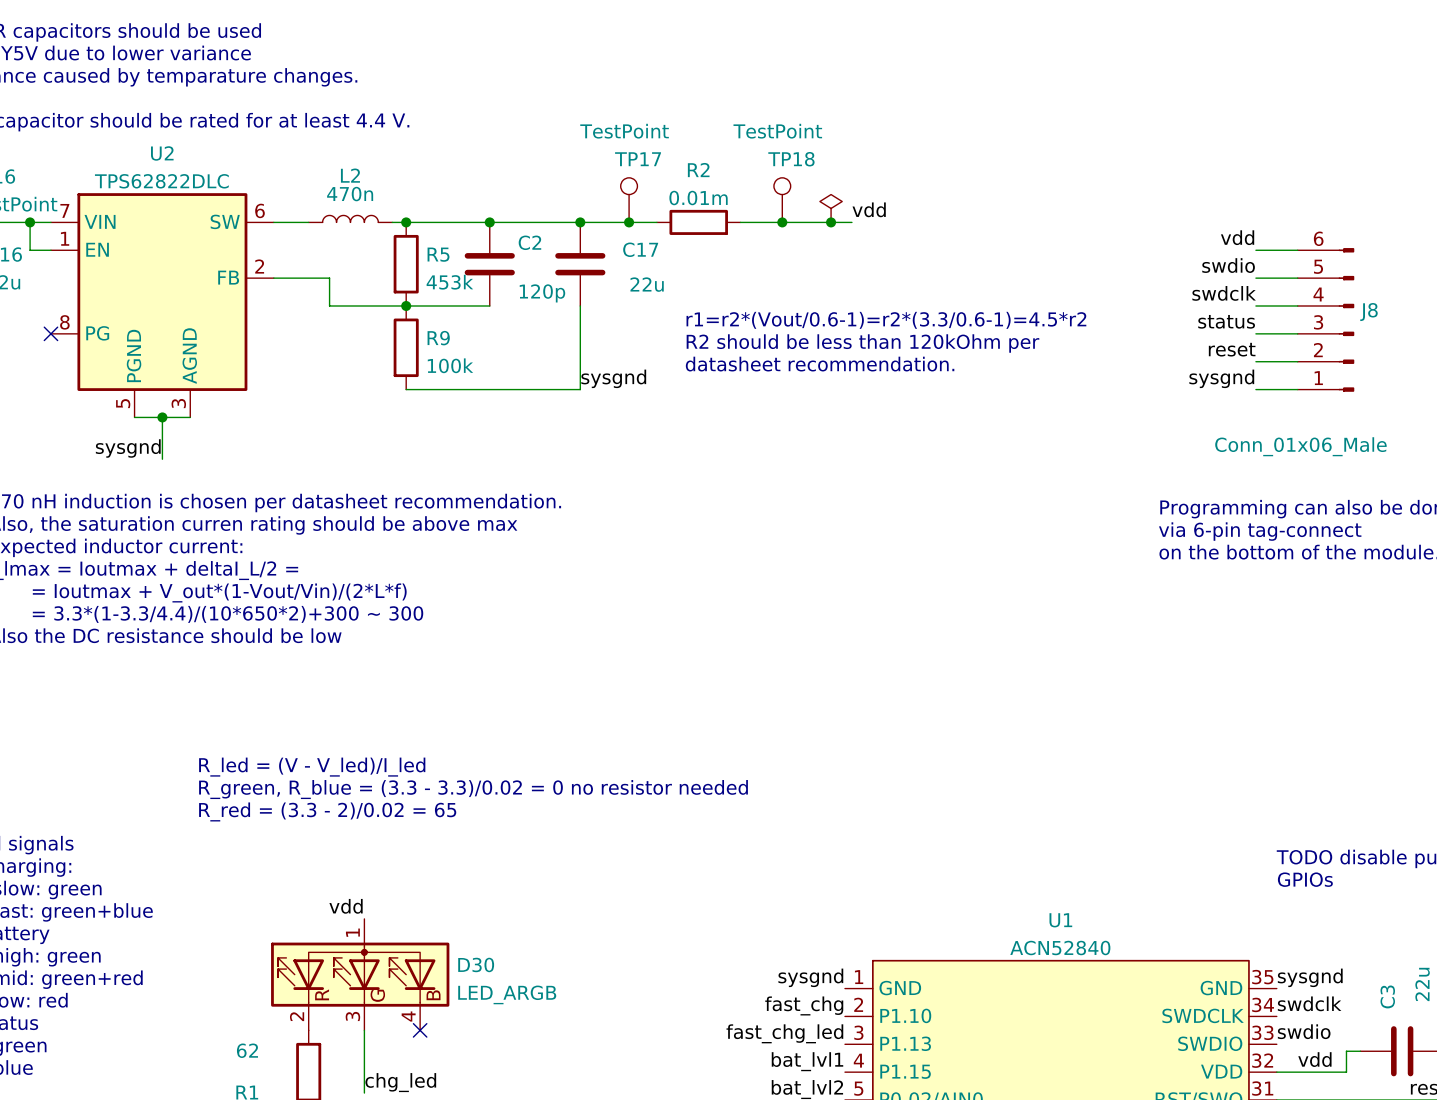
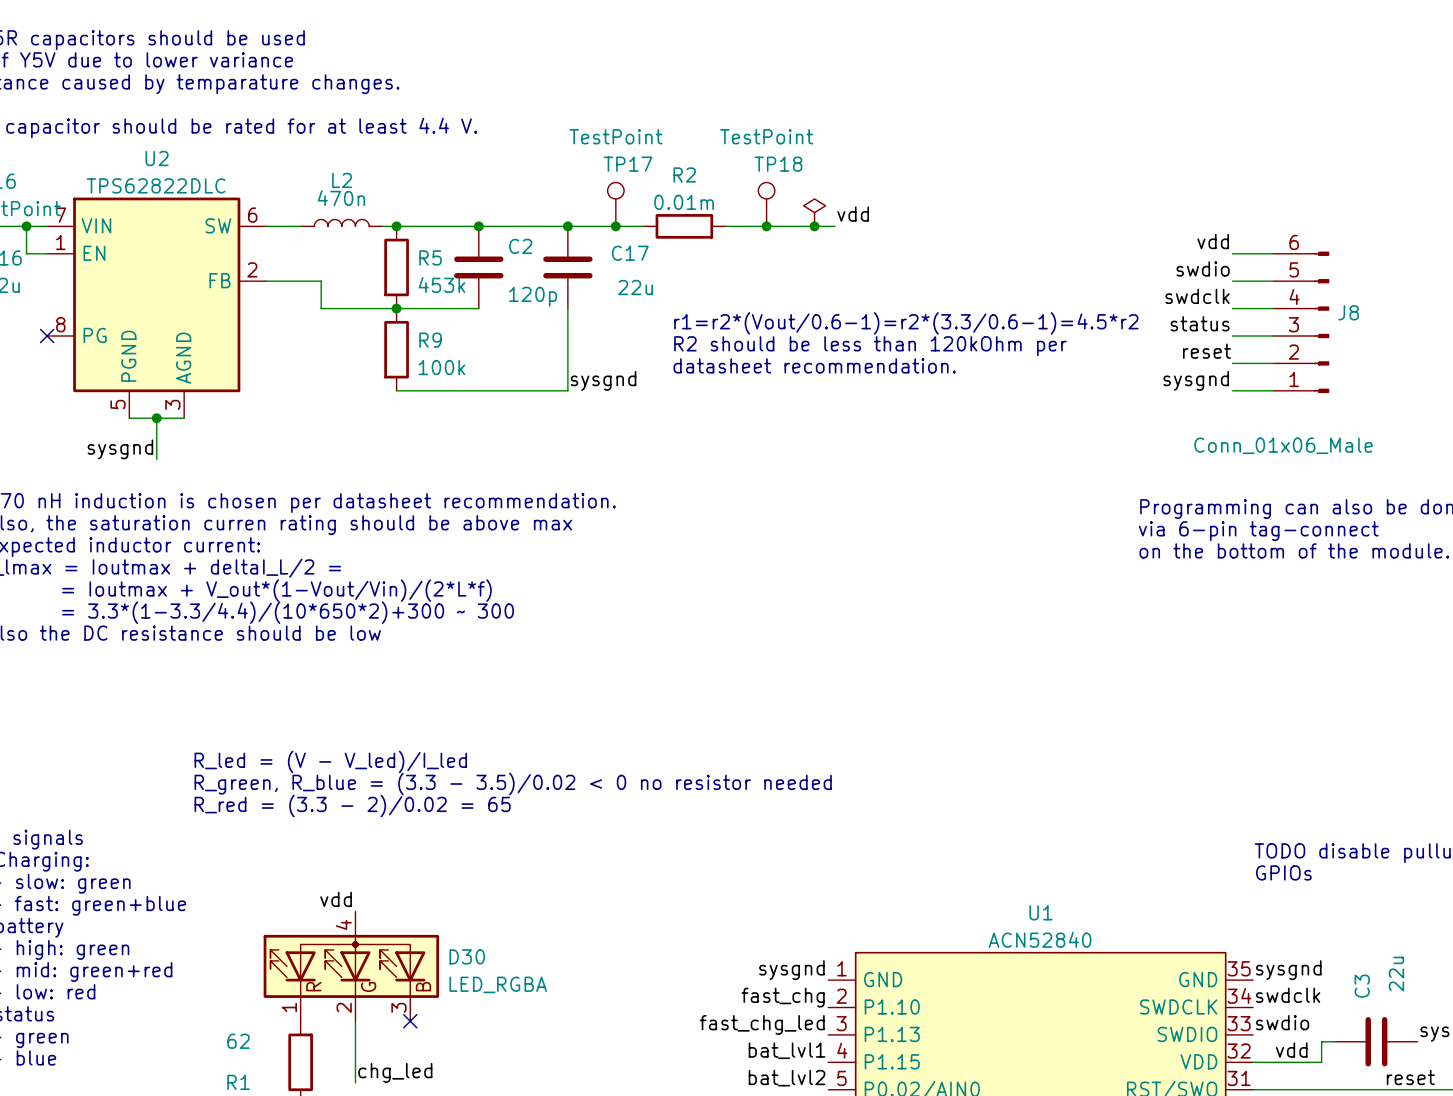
text: R_green, R_blue = (3.3 - 3.3)/0.02 = 0 no resistor needed (473, 789) -> R_green, R_blue = (3.3 - 3.5)/0.02 < 0 no resistor needed (513, 783)
D30 pin number: 1 (352, 932) -> 4 (343, 924)
D30 value: LED_ARGB (507, 994) -> LED_RGBA (498, 984)
D30 pin number: 2 (297, 1016) -> 1 (289, 1007)
D30 pin number: 3 (352, 1016) -> 2 (344, 1007)
D30 pin number: 4 (408, 1016) -> 3 (398, 1007)

